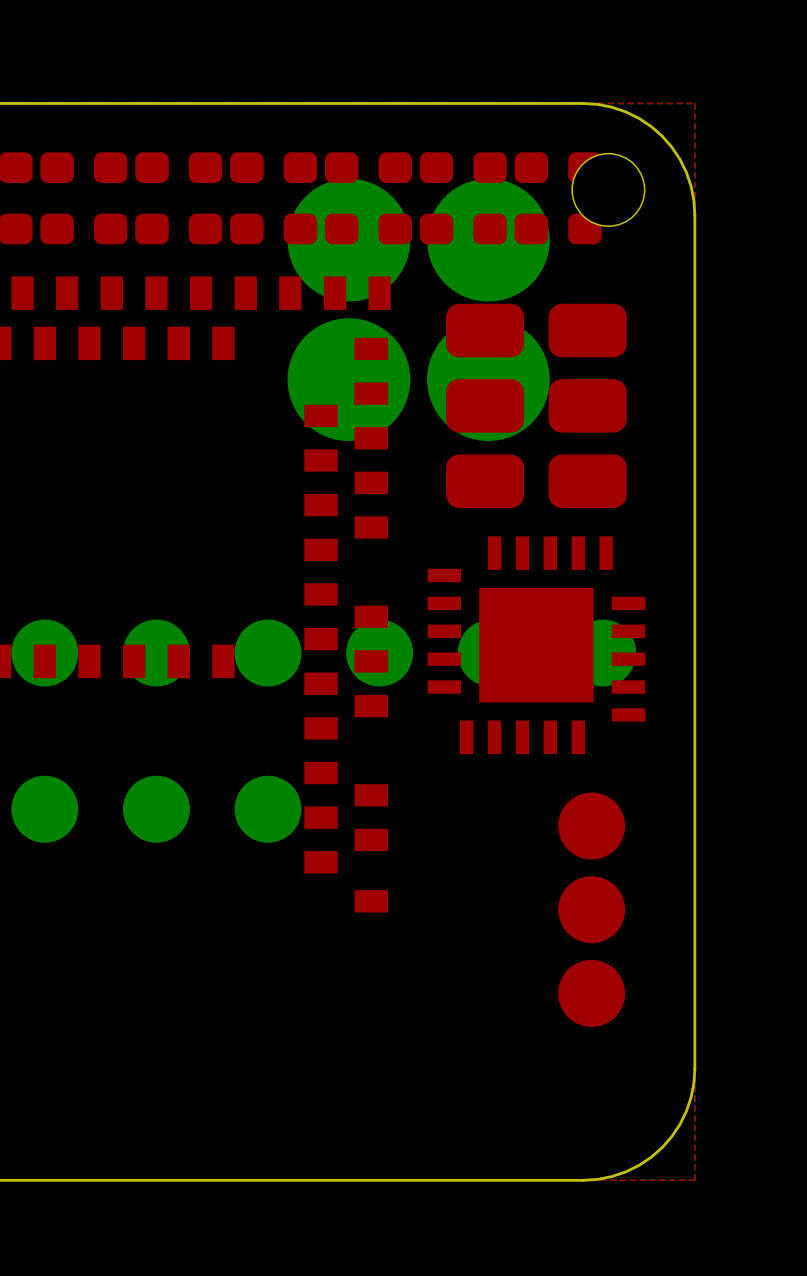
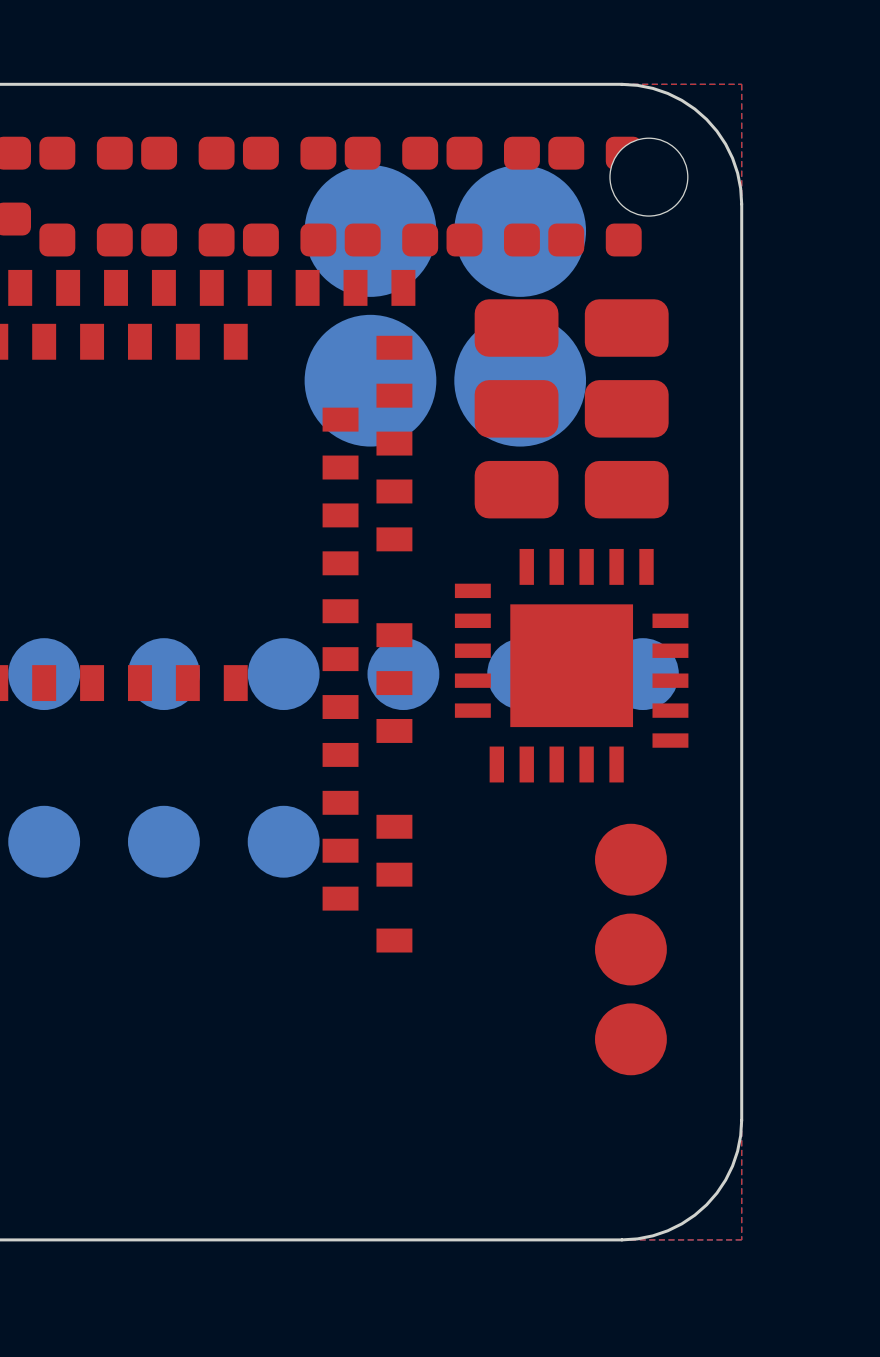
part position: (83, 228) -> (86, 240)
part position: (178, 228) -> (187, 240)
part position: (273, 228) -> (289, 240)
part position: (368, 228) -> (391, 240)
part position: (463, 228) -> (493, 240)
part position: (558, 228) -> (595, 240)

